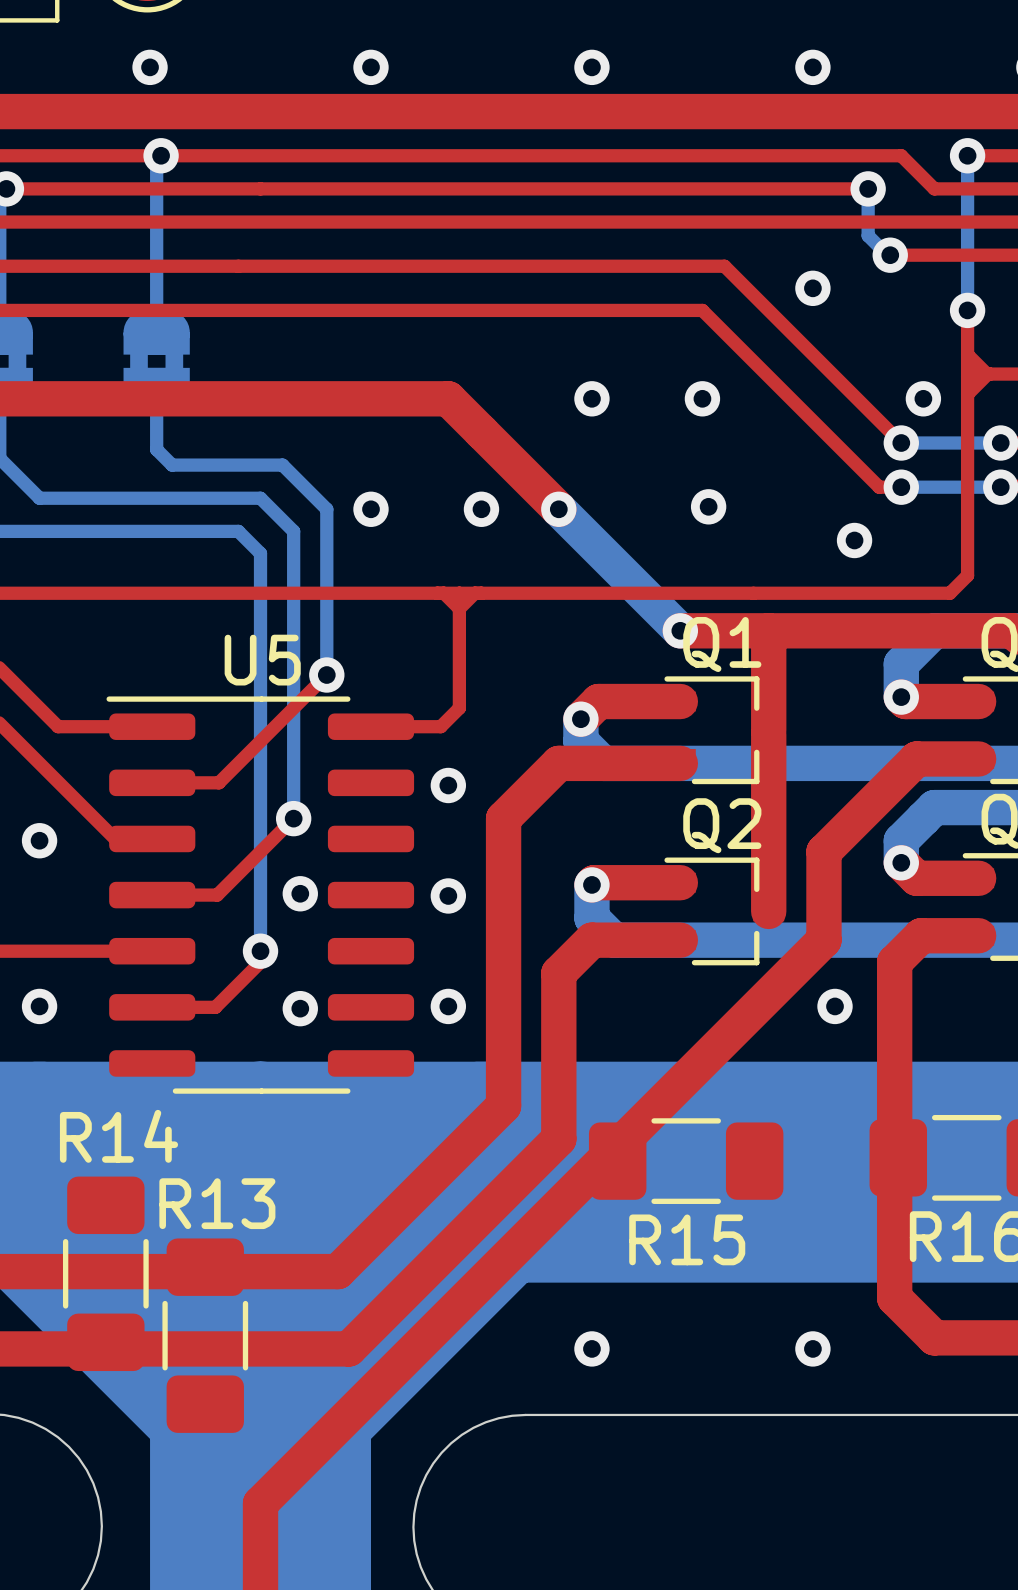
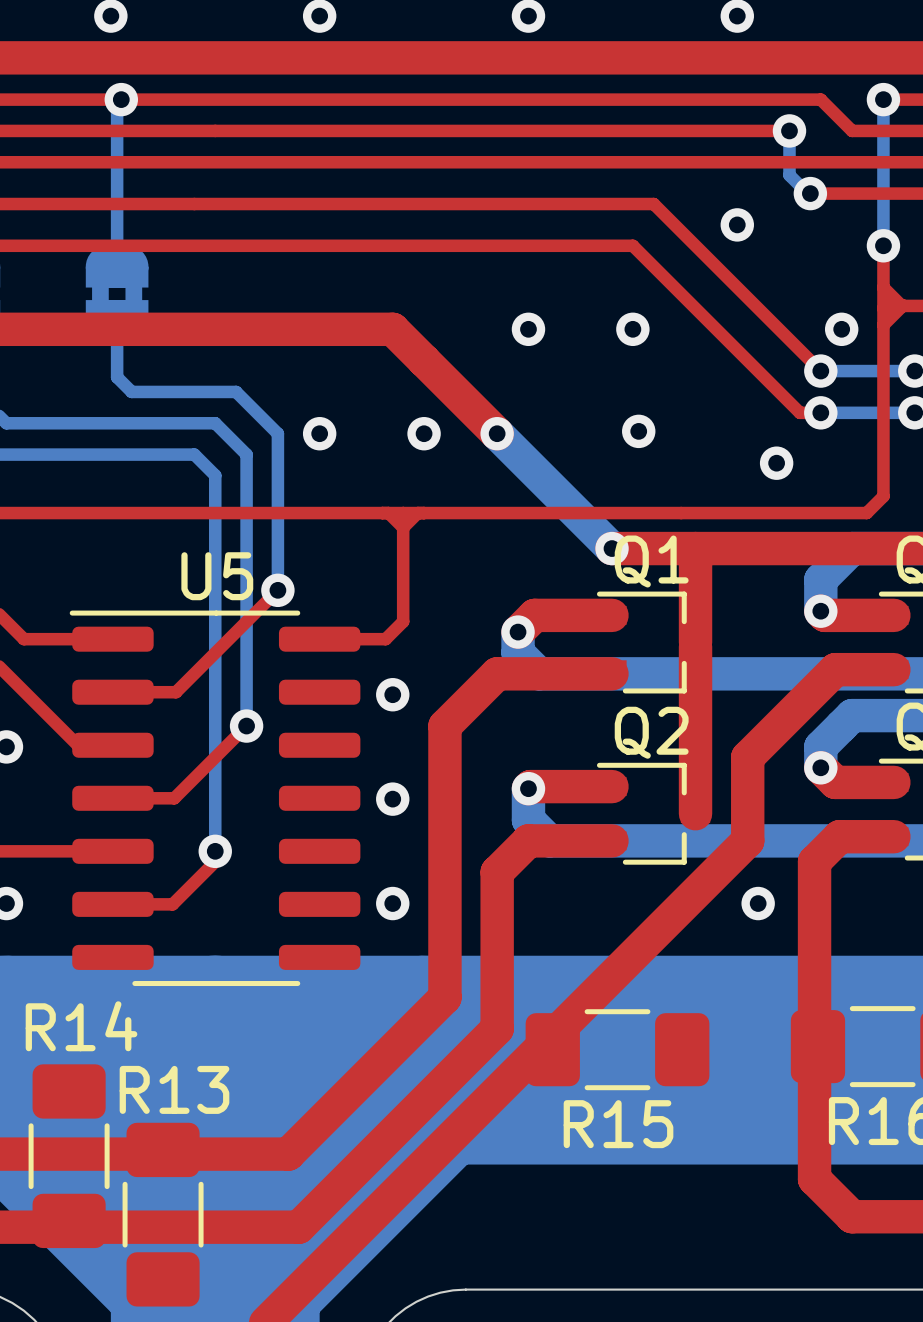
via: (300, 893) -> none
via: (300, 1008) -> none
via: (591, 1348) -> none
via: (812, 1348) -> none

